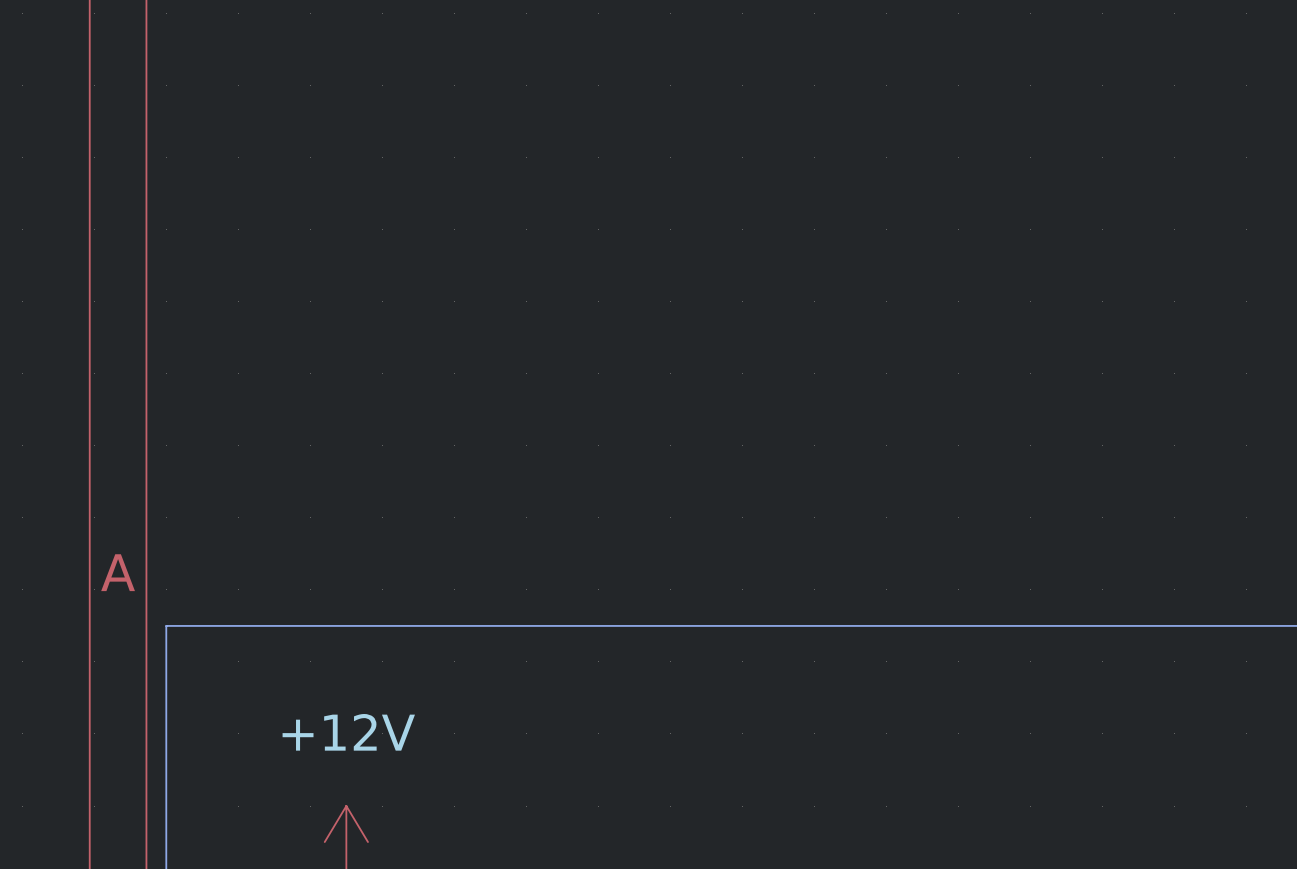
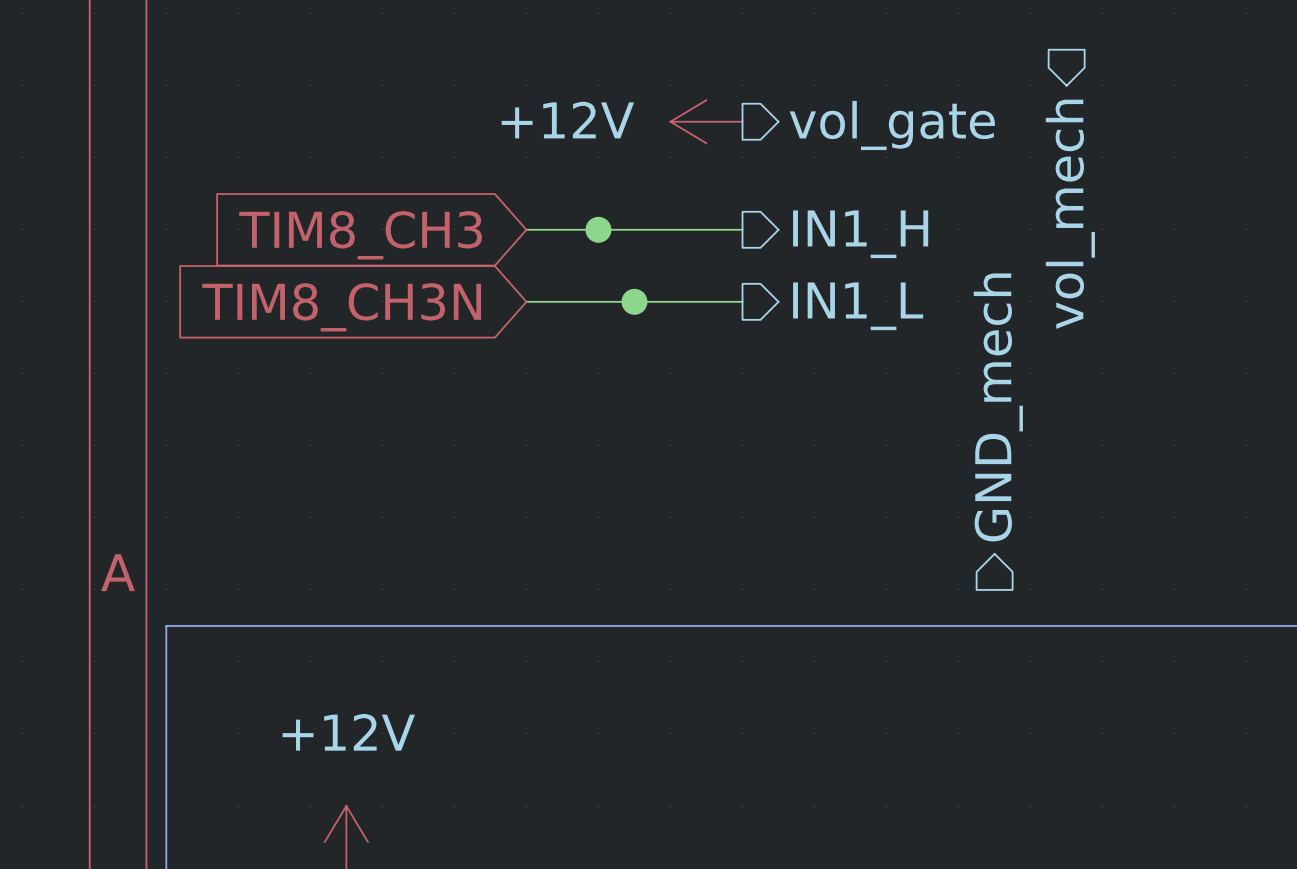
power symbol: none -> +12V (706, 121)
sheet pin: none -> vol_gate (892, 125)
sheet pin: none -> vol_mech (1070, 214)
wire: none -> (526, 229) (742, 229)
junction: none -> (598, 229)
sheet pin: none -> IN1_H (860, 234)
global label: none -> TIM8_CH3 (360, 235)
wire: none -> (526, 301) (742, 301)
junction: none -> (634, 301)
sheet pin: none -> IN1_L (858, 306)
global label: none -> TIM8_CH3N (341, 307)
sheet pin: none -> GND_mech (998, 407)

